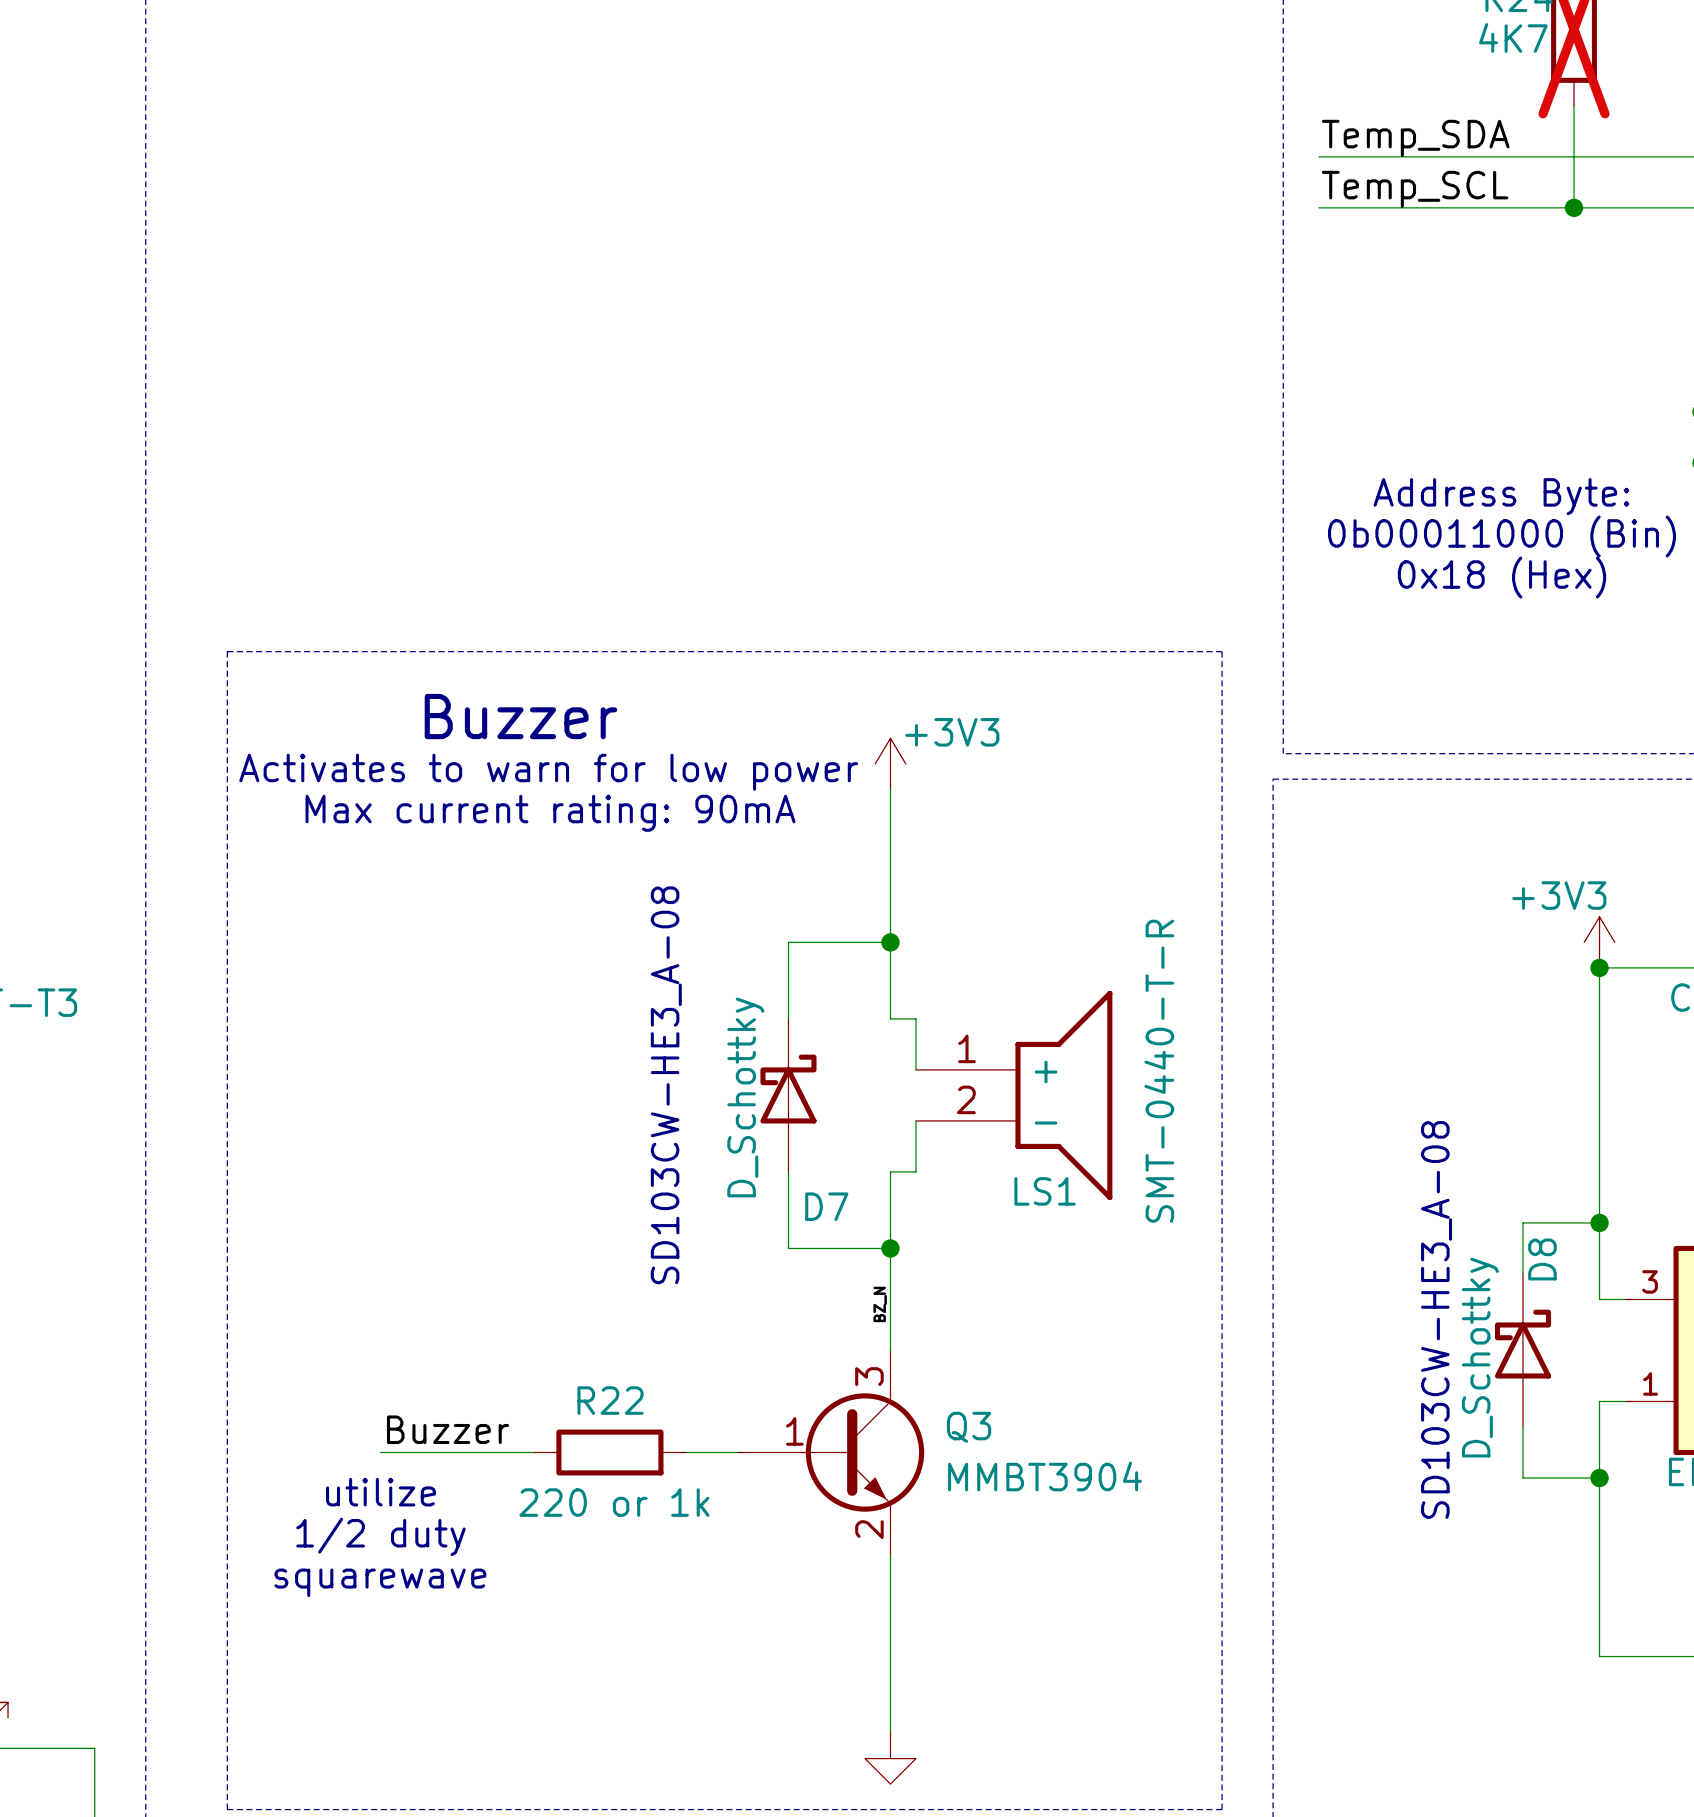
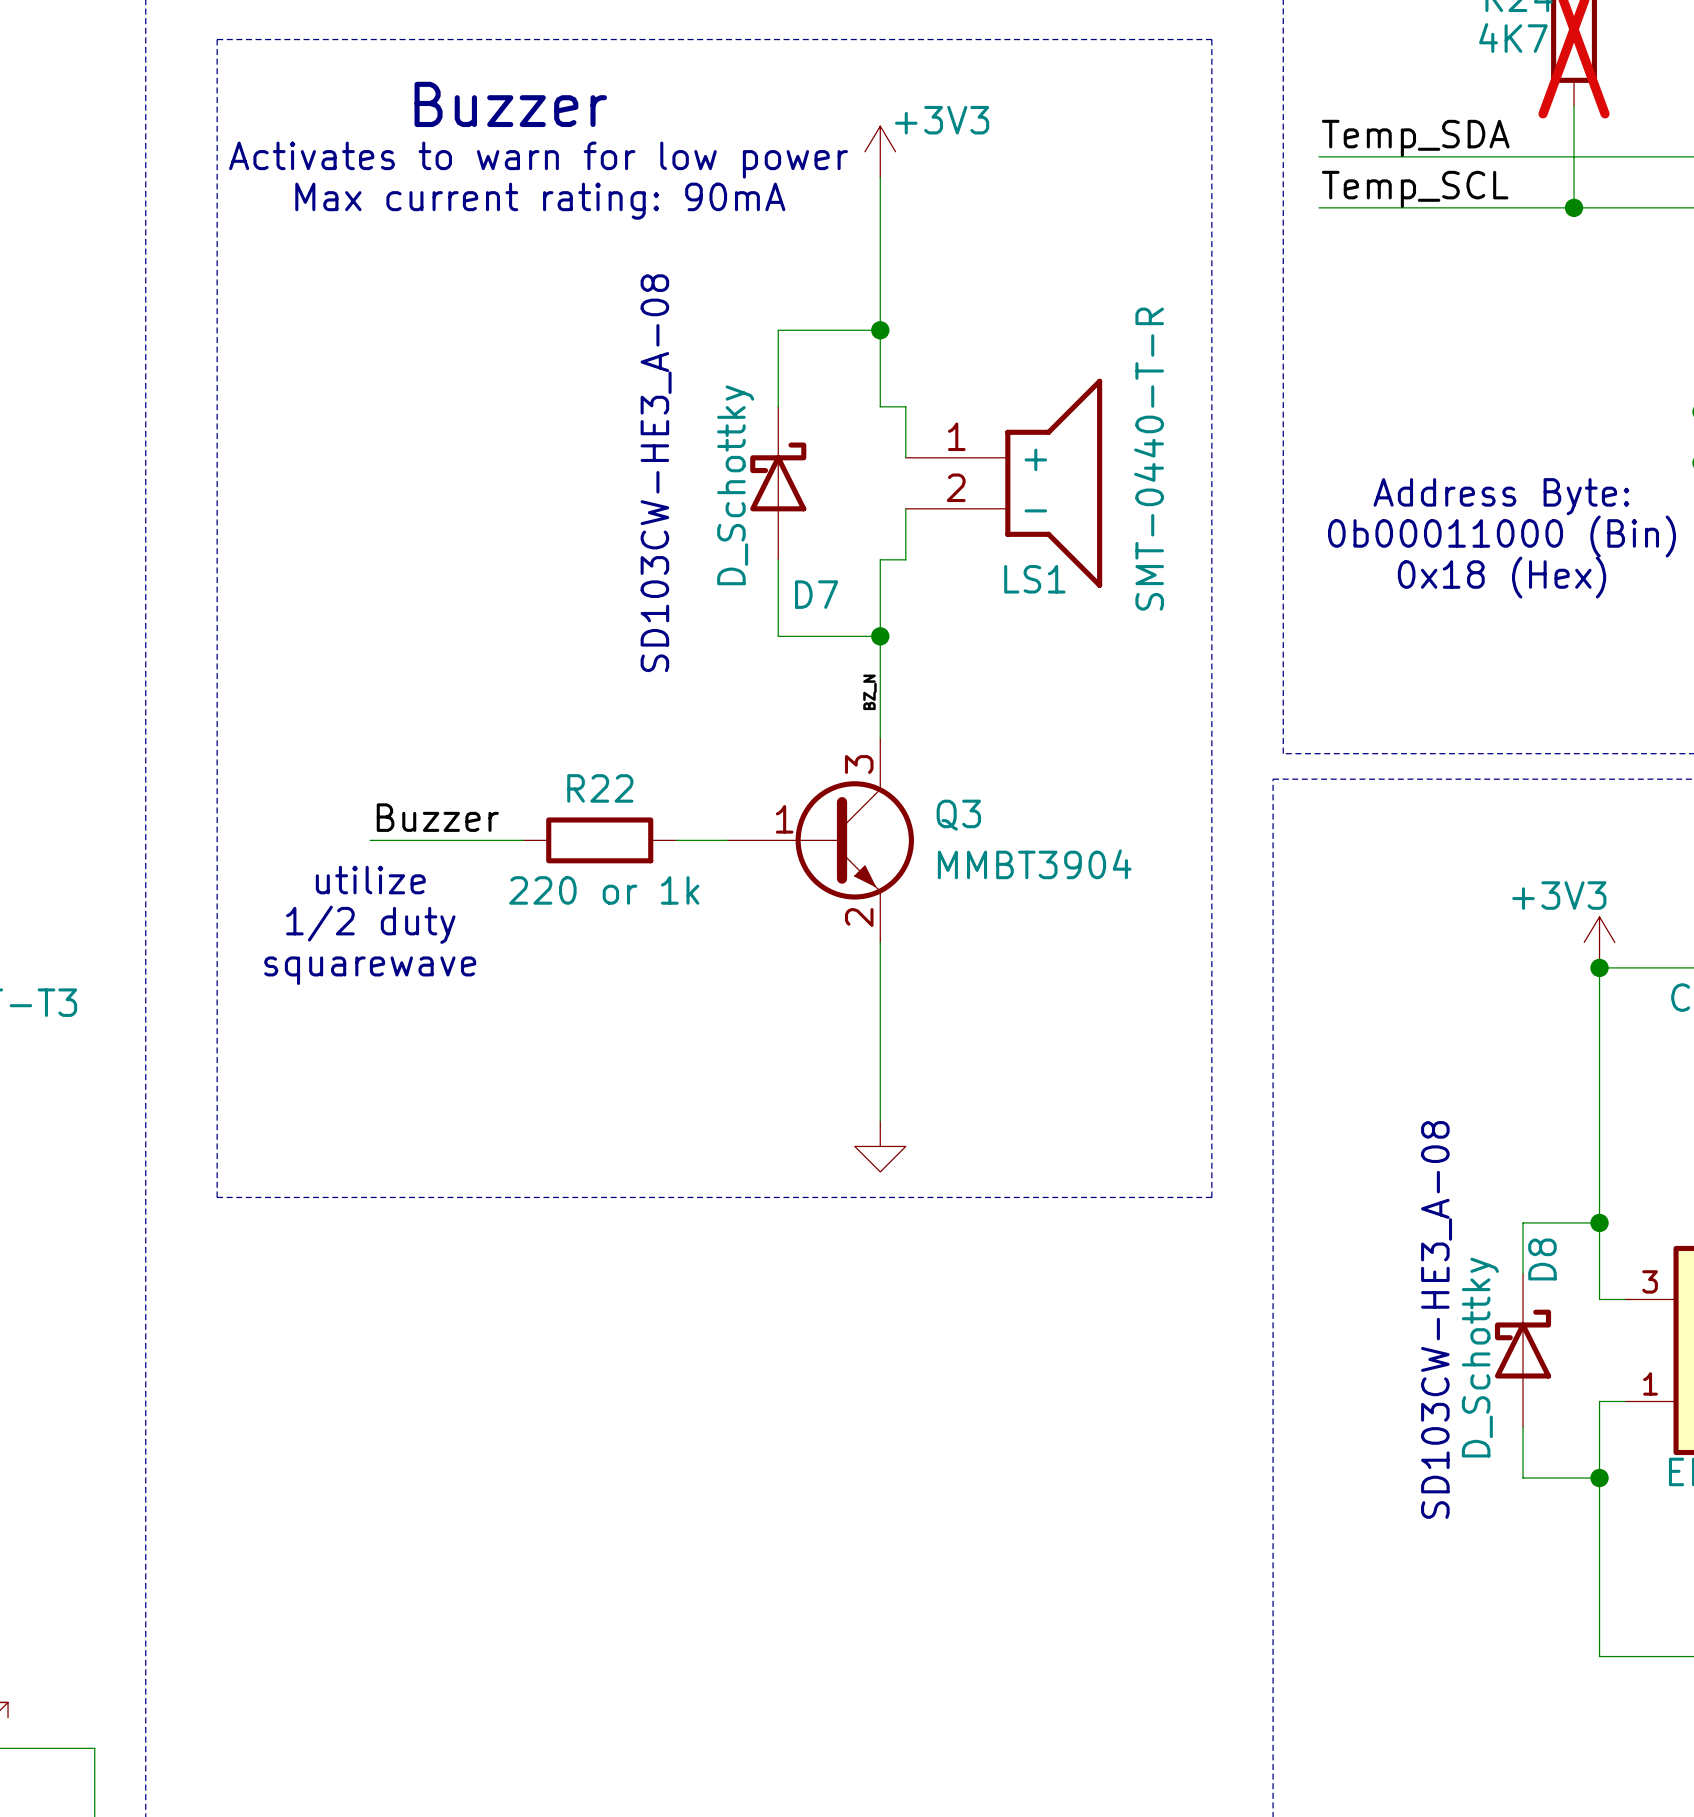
line: none -> (217, 39) (1211, 39) (1211, 1197) (217, 1197) (217, 39)
text: none -> Buzzer (510, 104)
power symbol: none -> +3V3 (880, 151)
text: none -> Activates to warn for low power (538, 160)
wire: none -> (880, 177) (880, 406) (905, 406) (905, 457)
text: none -> Max current rating: 90mA (540, 201)
wire: none -> (880, 330) (778, 330) (778, 406)
junction: none -> (880, 330)
text: none -> SD103CW-HE3_A-08 (656, 473)
wire: none -> (905, 508) (905, 559) (880, 559) (880, 738)
wire: none -> (778, 559) (778, 636) (880, 636)
junction: none -> (880, 636)
line: (227, 651) (1222, 651) (1222, 1809) (227, 1809) (227, 651) -> none
label: none -> BZ_N (869, 692)
text: Buzzer (520, 716) -> none
power symbol: +3V3 (890, 763) -> none
text: Activates to warn for low power (548, 772) -> none
wire: (890, 789) (890, 1018) (915, 1018) (915, 1069) -> none
text: Max current rating: 90mA (550, 813) -> none
label: none -> Buzzer (437, 817)
wire: none -> (370, 840) (523, 840)
wire: none -> (676, 840) (727, 840)
text: none -> utilize (370, 880)
text: none -> 1/2 duty (370, 924)
wire: none -> (880, 942) (880, 1120)
wire: (890, 942) (788, 942) (788, 1018) -> none
junction: (890, 942) -> none
text: none -> squarewave (370, 970)
text: SD103CW-HE3_A-08 (666, 1085) -> none
D7 position: (788, 1095) -> (778, 483)
LS1 position: (1014, 1095) -> (1003, 483)
wire: (915, 1120) (915, 1171) (890, 1171) (890, 1350) -> none
power symbol: none -> (880, 1146)
wire: (788, 1171) (788, 1248) (890, 1248) -> none
junction: (890, 1248) -> none
label: BZ_N (880, 1304) -> none
label: Buzzer (447, 1429) -> none
wire: (380, 1452) (533, 1452) -> none
R22 position: (609, 1452) -> (599, 840)
wire: (686, 1452) (737, 1452) -> none
Q3 position: (830, 1452) -> (820, 840)
text: utilize (380, 1492) -> none
text: 1/2 duty (380, 1536) -> none
wire: (890, 1554) (890, 1733) -> none
text: squarewave (380, 1582) -> none
power symbol: (890, 1758) -> none

